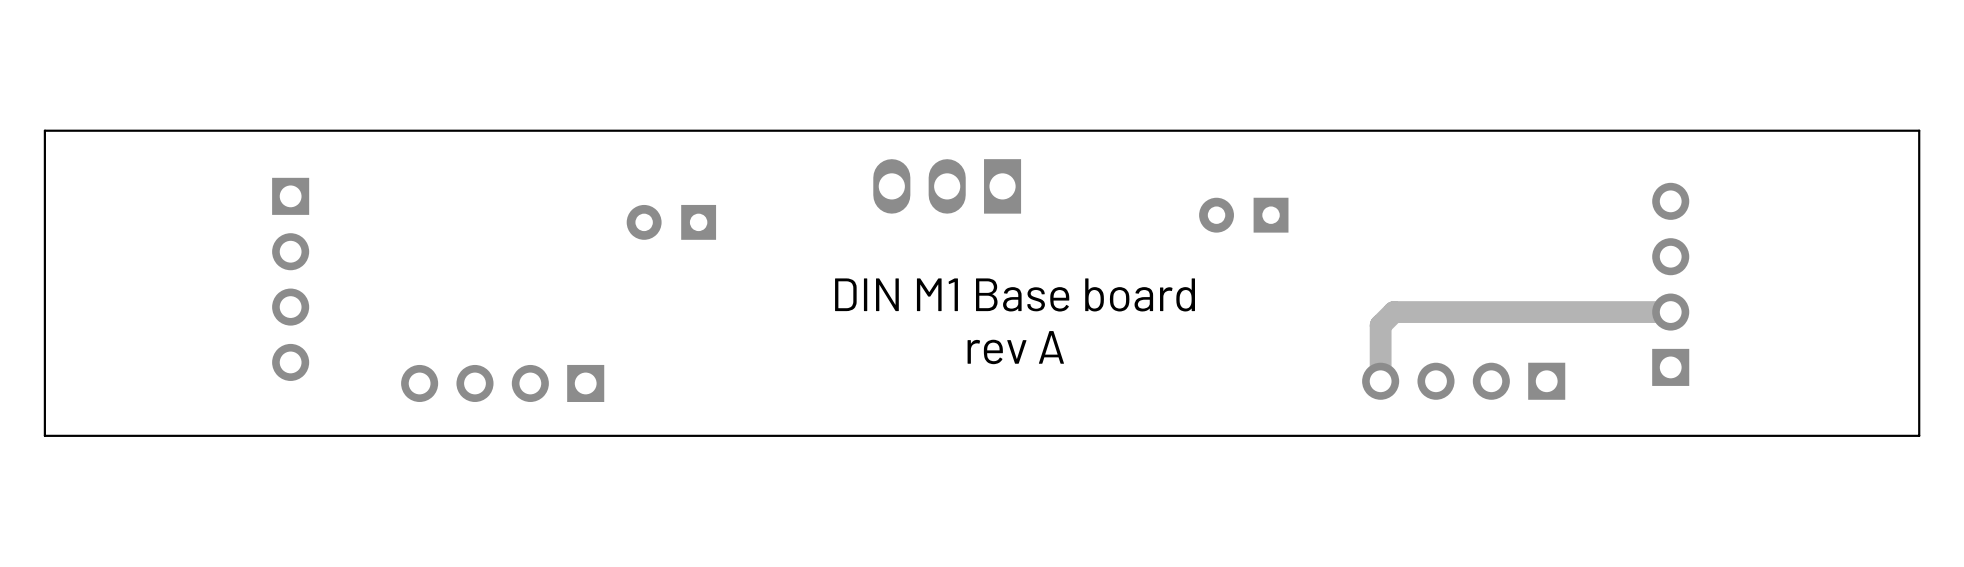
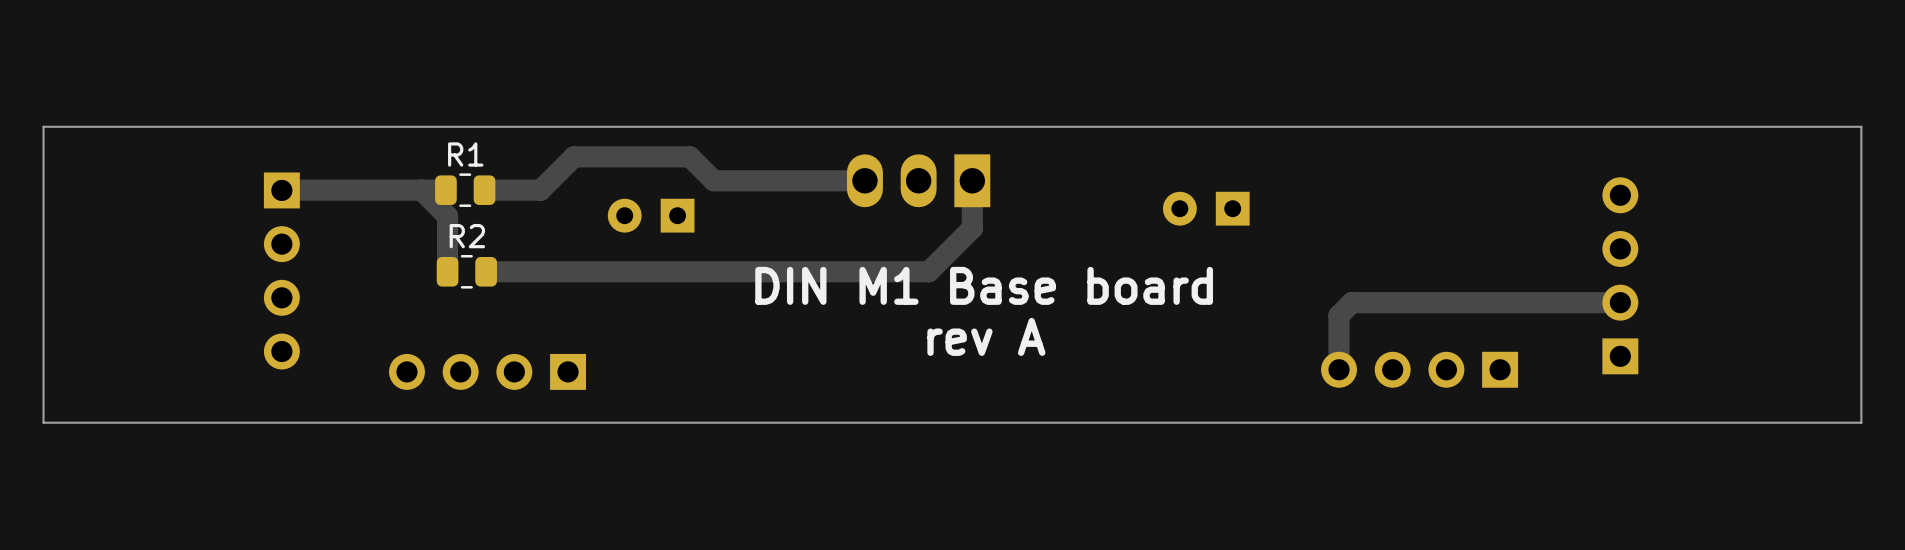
track: none -> (864, 180) (713, 180) (689, 156) (573, 156) (540, 190) (484, 190)
track: none -> (972, 180) (972, 228) (928, 271) (486, 271)
track: none -> (421, 190) (447, 216) (447, 271)
track: none -> (445, 190) (282, 190)
R1: none -> (465, 190)
R2: none -> (466, 271)

